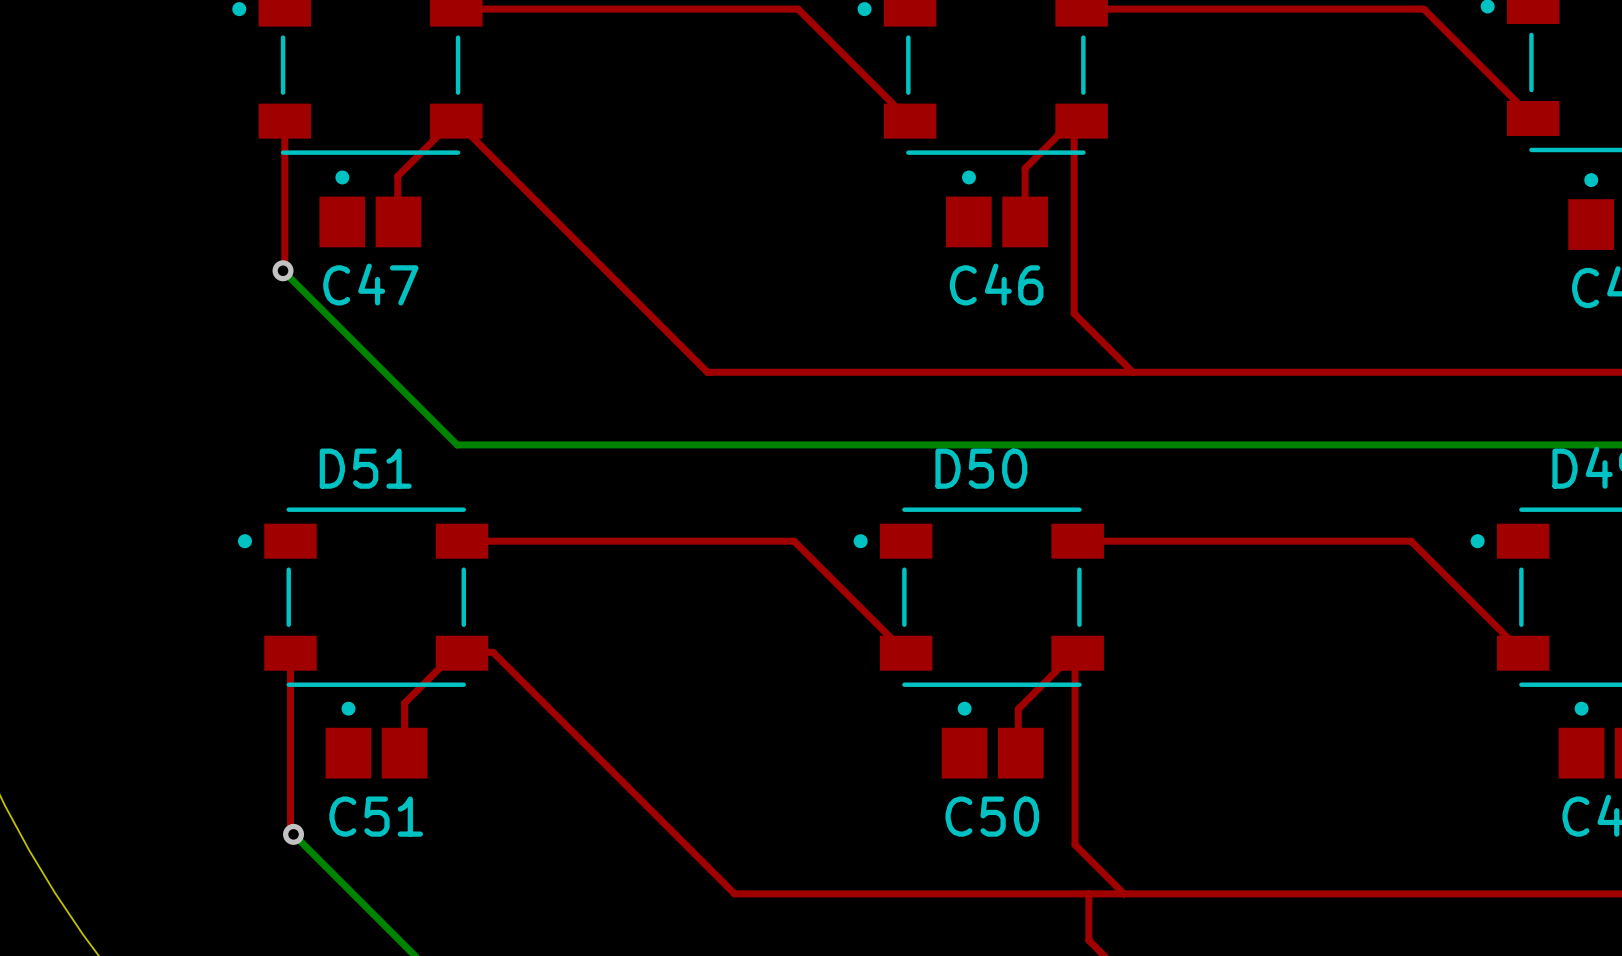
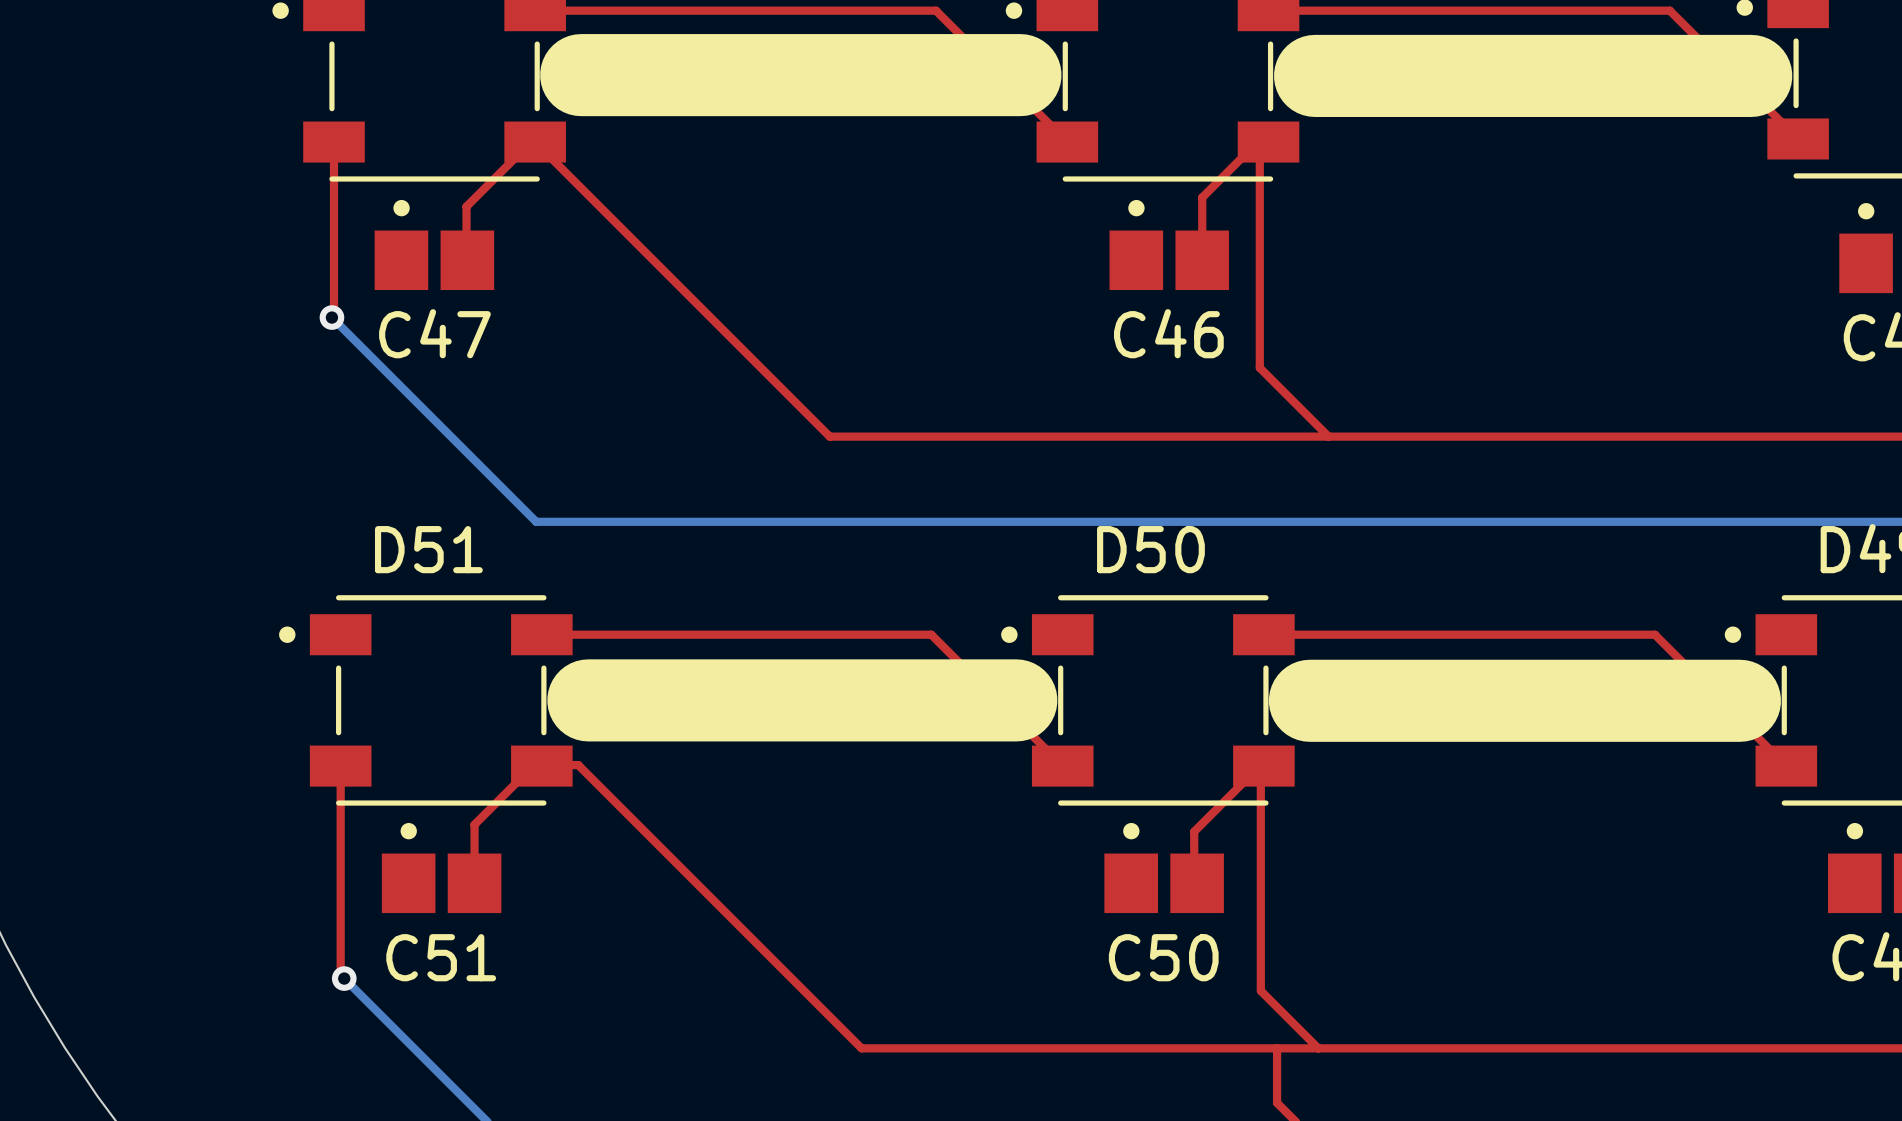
line: none -> (581, 75) (1020, 75)
line: none -> (1315, 75) (1751, 75)
line: none -> (588, 700) (1016, 700)
line: none -> (1309, 700) (1739, 700)

